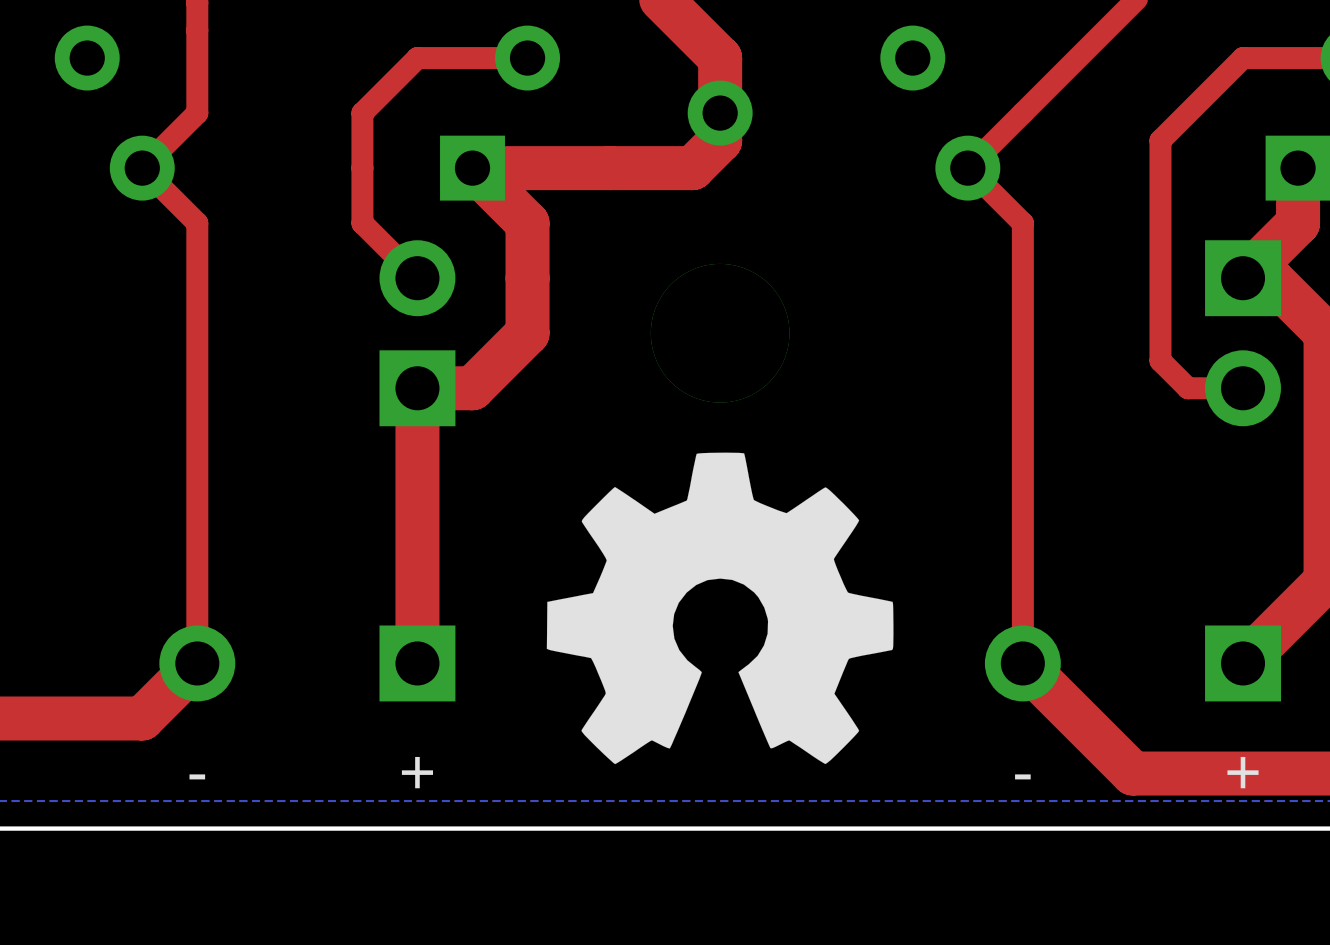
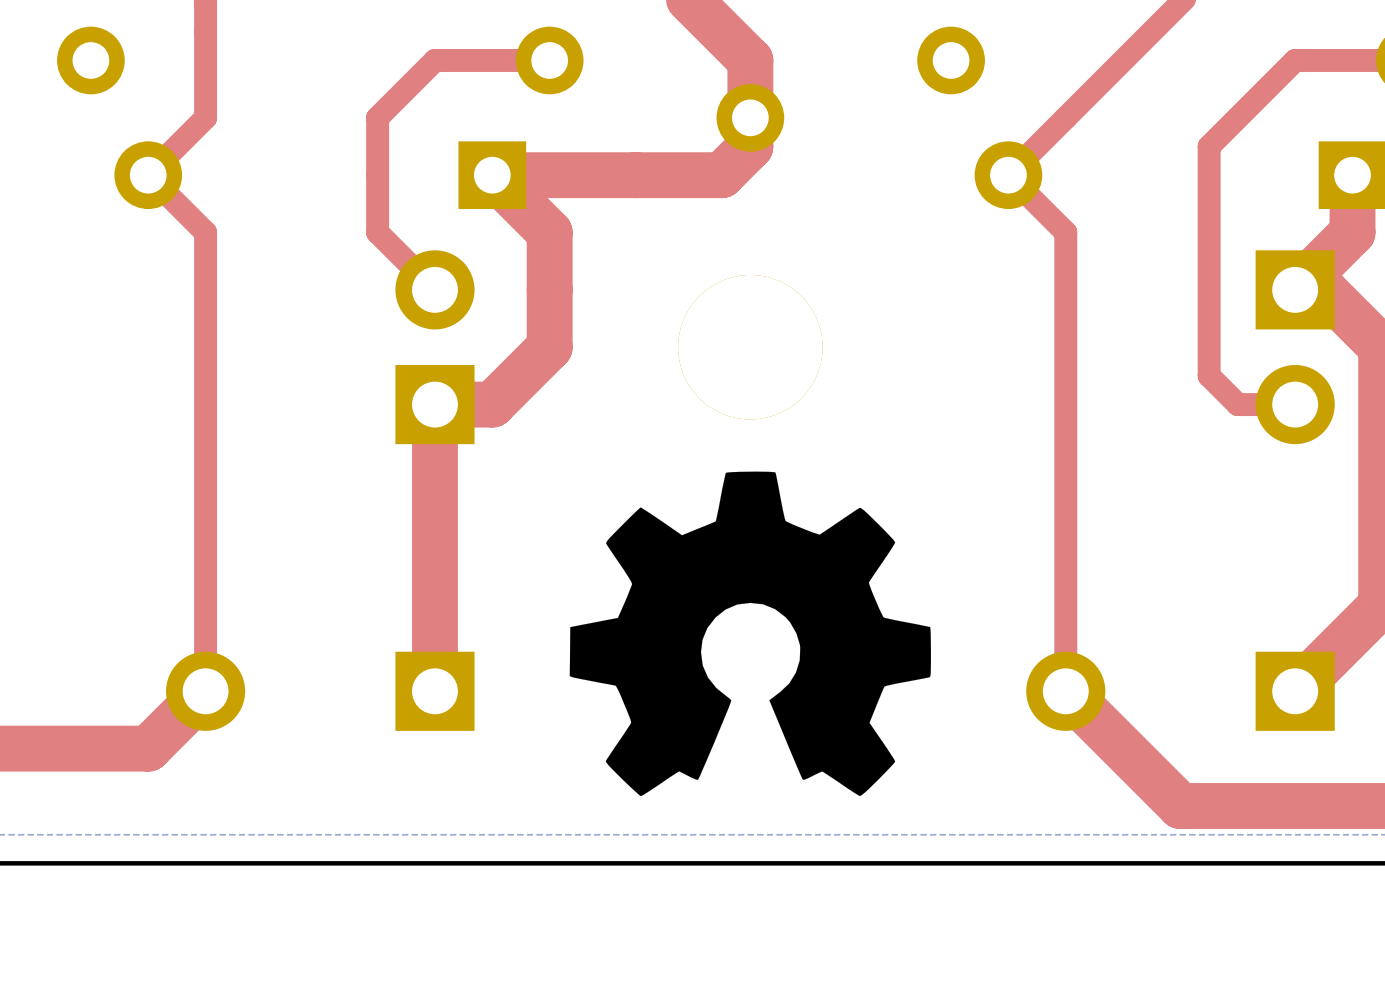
text: + (417, 772) -> none
text: + (1243, 772) -> none
text: - (197, 776) -> none
text: - (1022, 776) -> none

